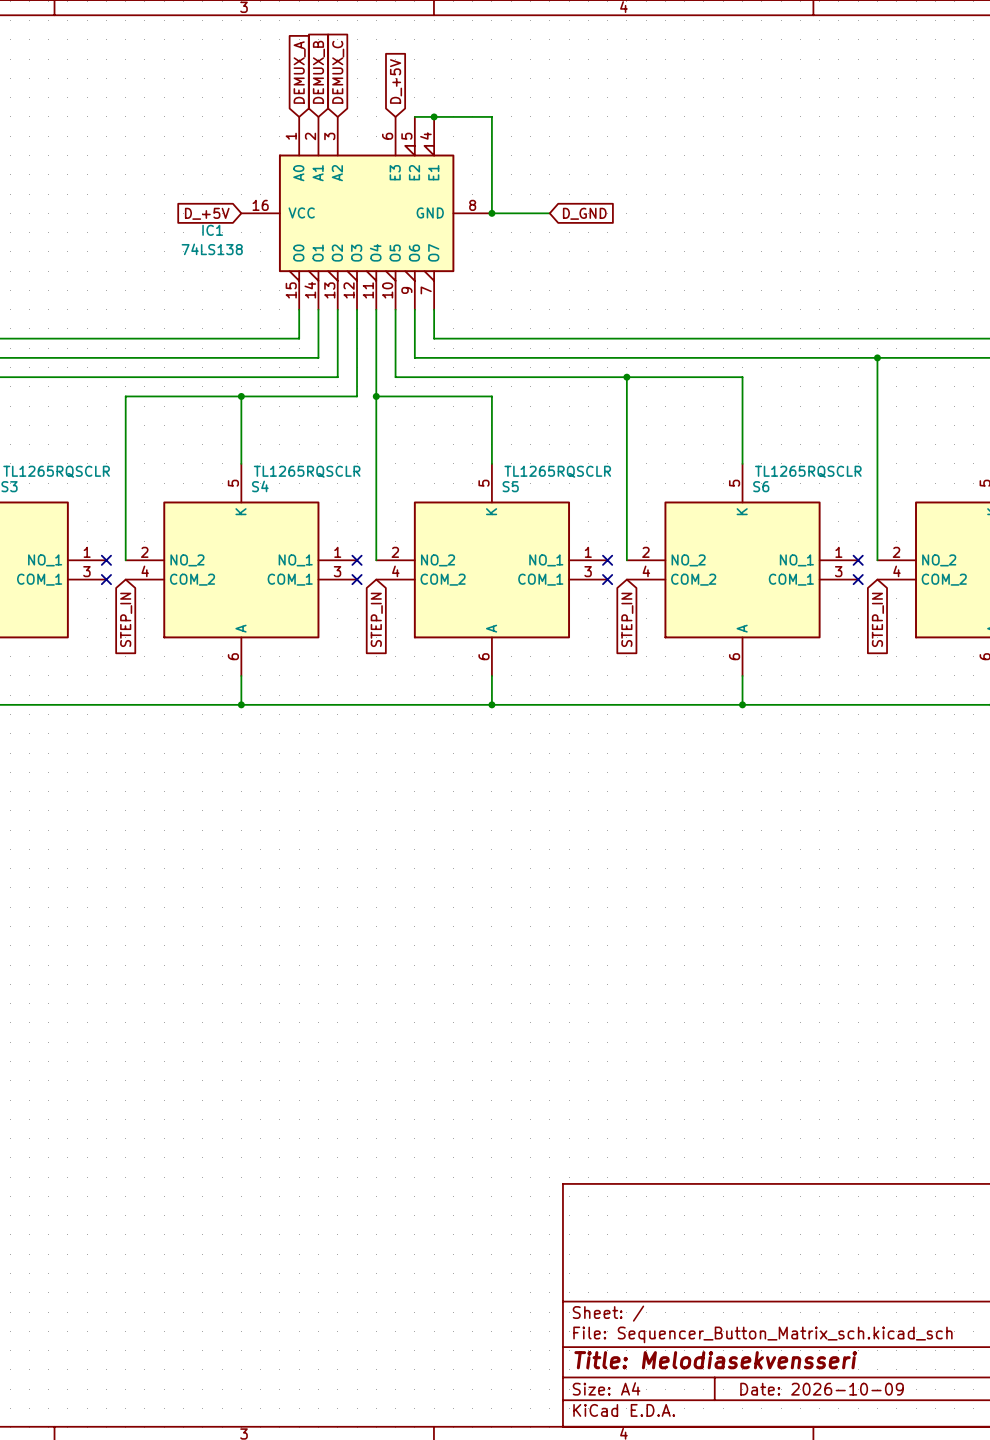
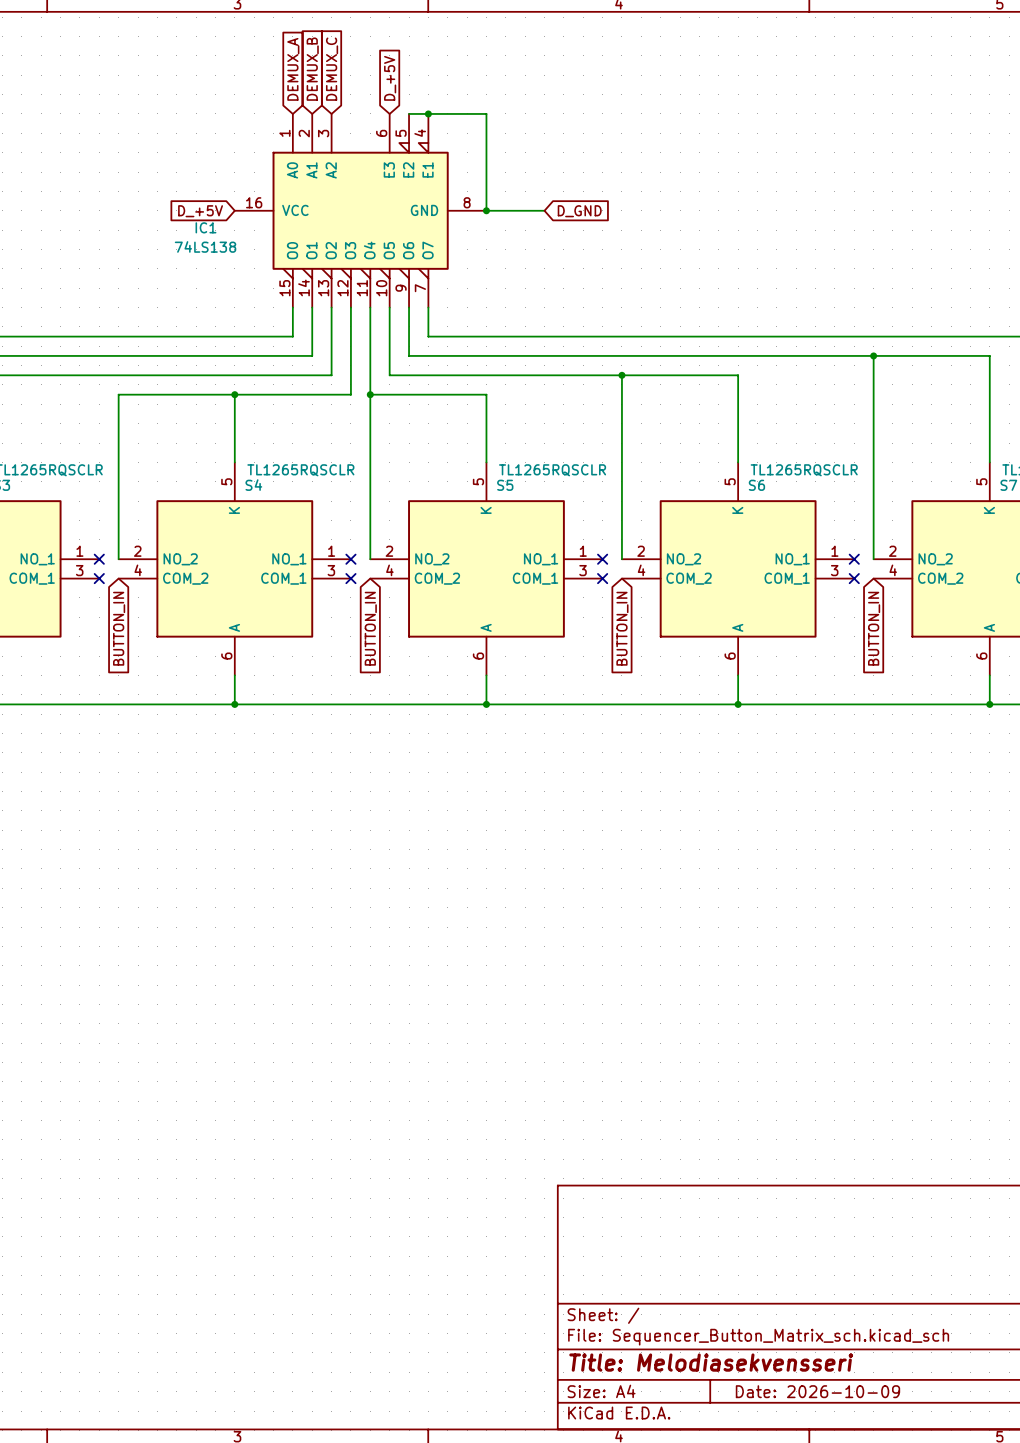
global label: STEP_IN (126, 619) -> BUTTON_IN (119, 628)
global label: STEP_IN (376, 619) -> BUTTON_IN (370, 628)
global label: STEP_IN (627, 619) -> BUTTON_IN (622, 628)
global label: STEP_IN (877, 619) -> BUTTON_IN (874, 628)

